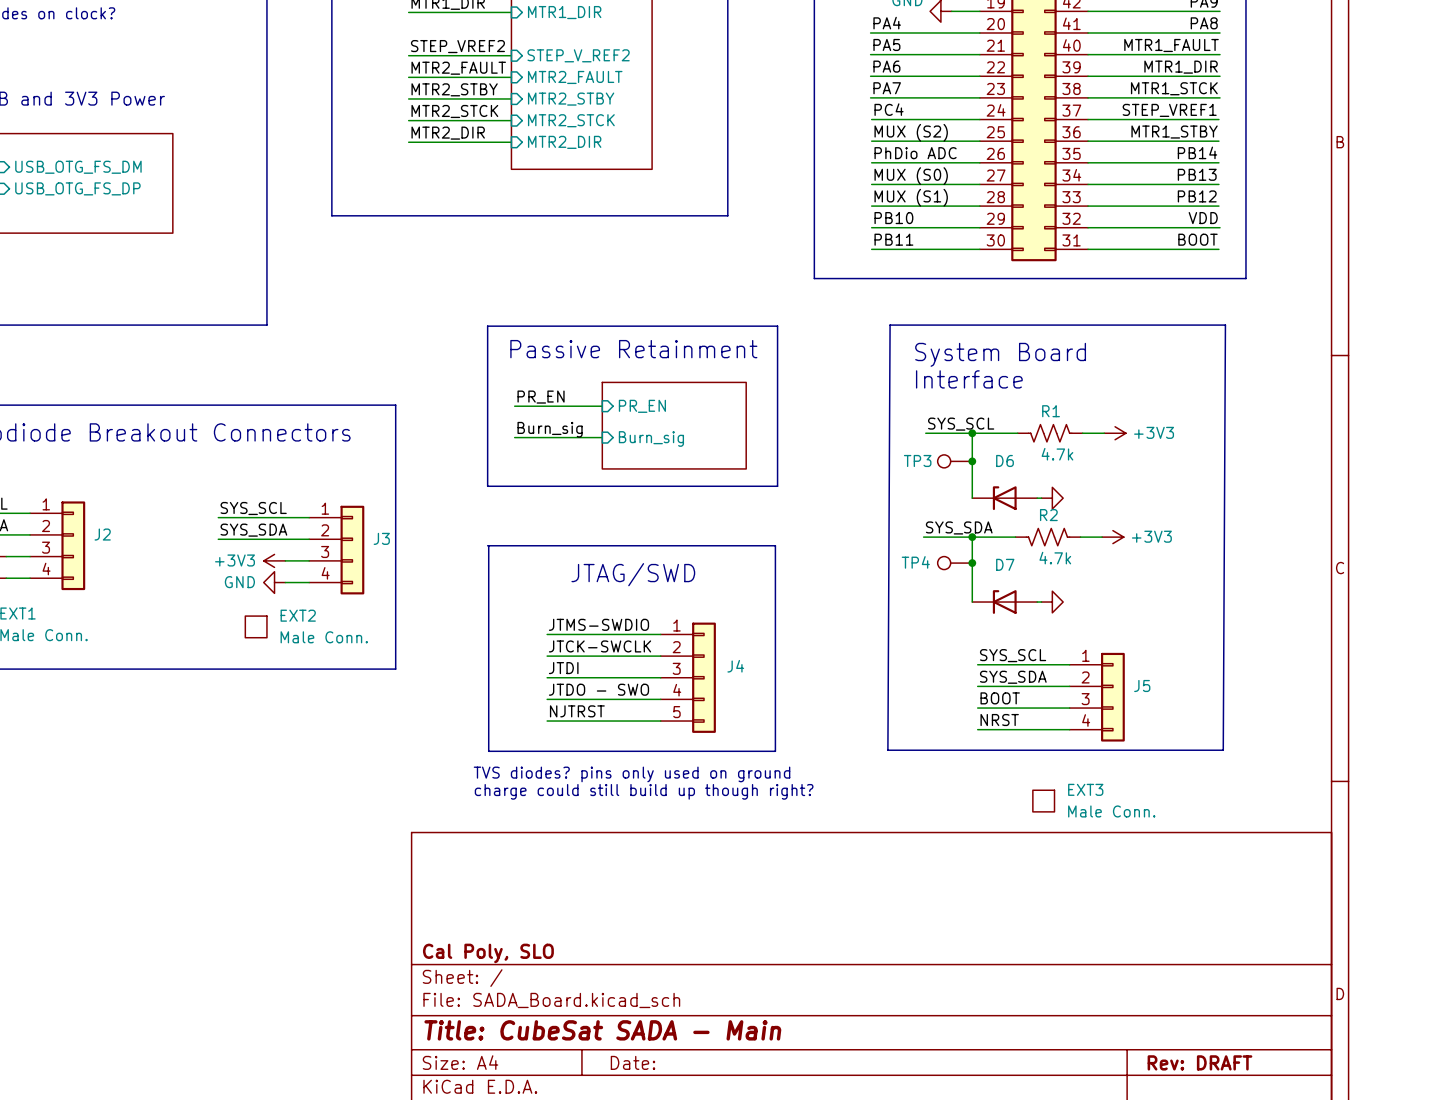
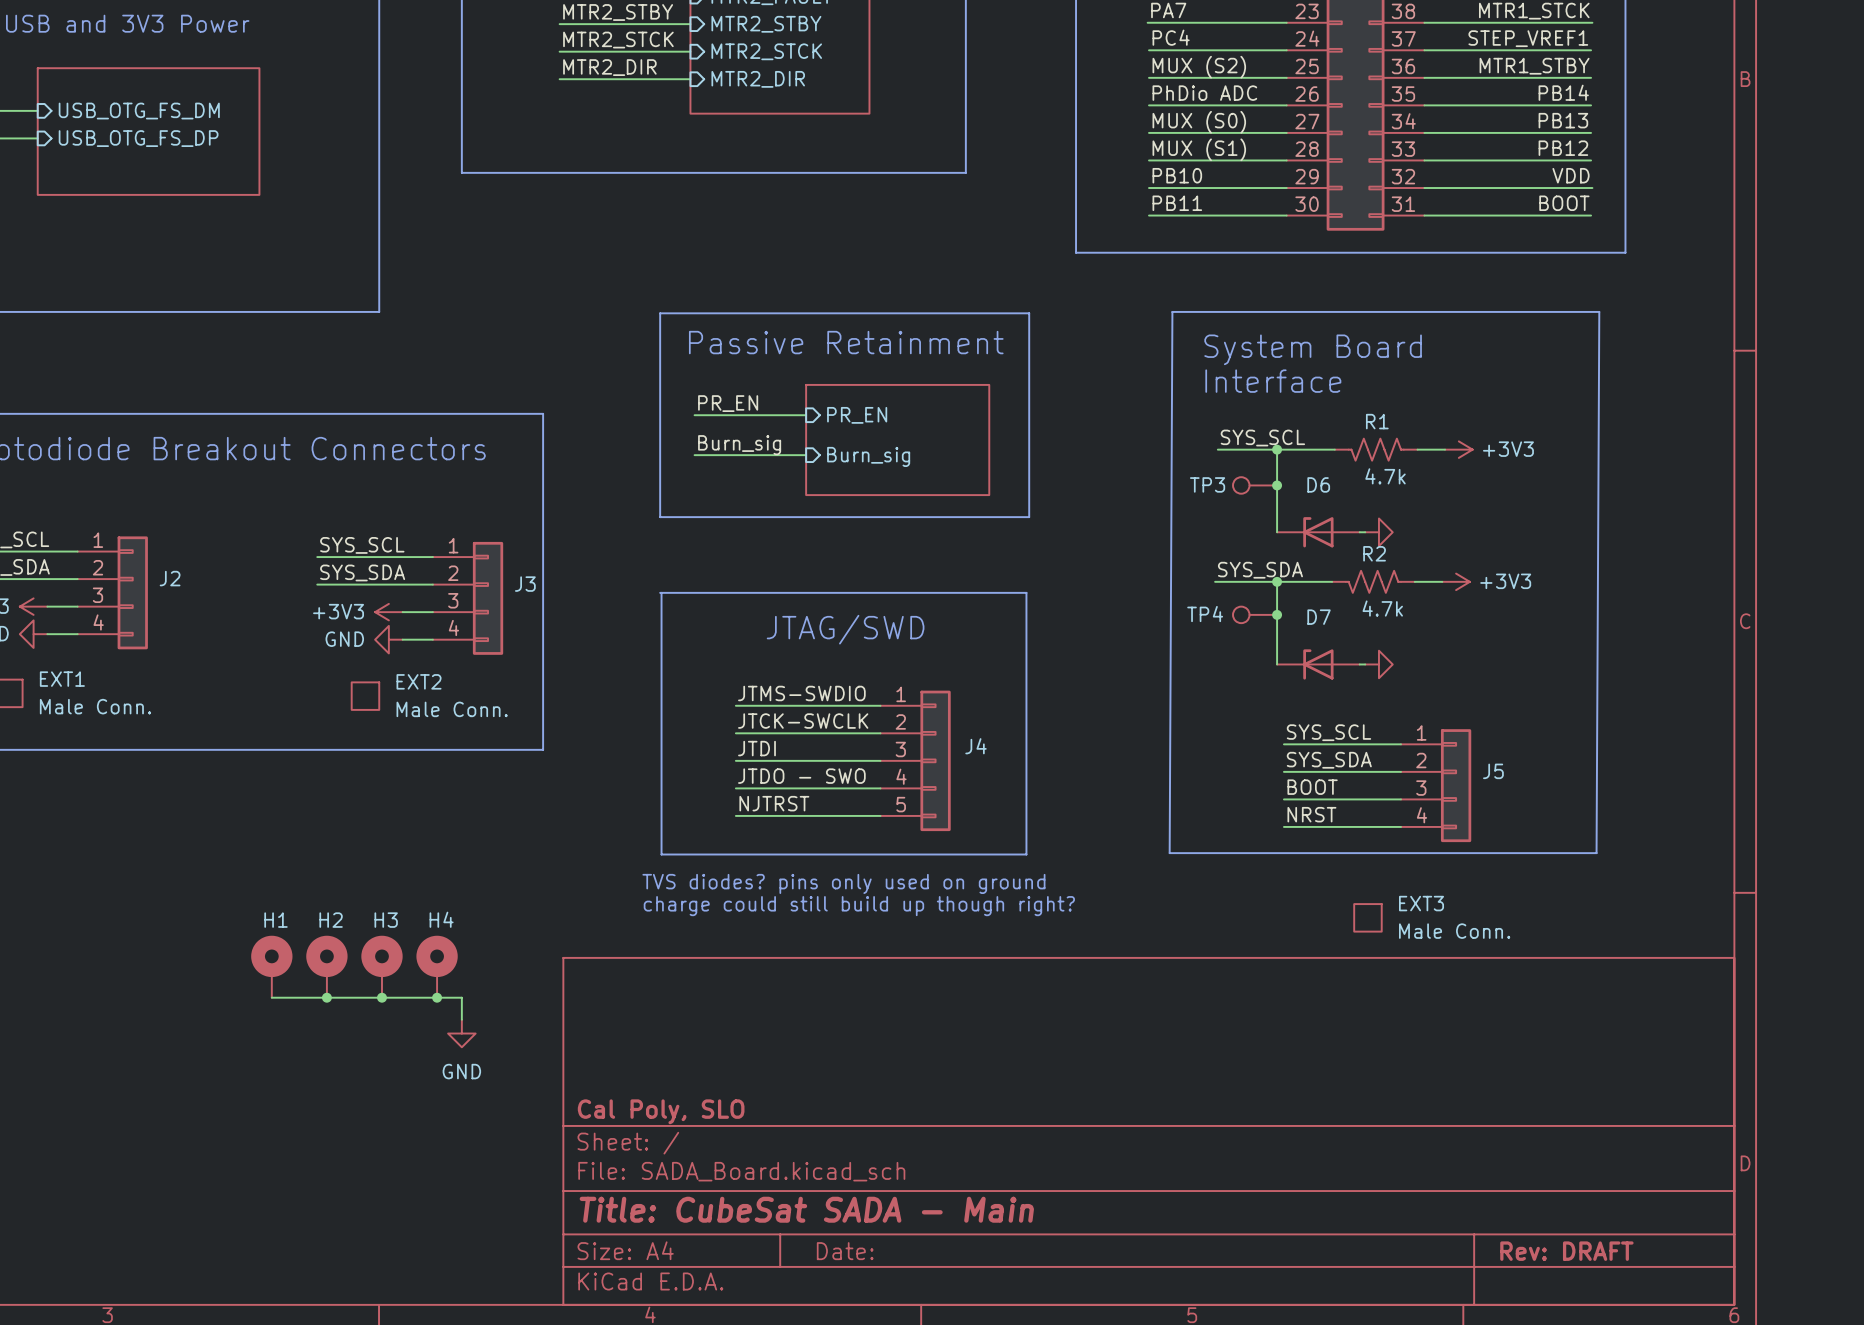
H1: none -> (271, 966)
H2: none -> (326, 966)
H3: none -> (381, 966)
H4: none -> (437, 966)
wire: none -> (271, 997) (461, 997) (461, 1019)
junction: none -> (326, 997)
junction: none -> (381, 997)
junction: none -> (437, 997)
power symbol: none -> GND (461, 1033)

